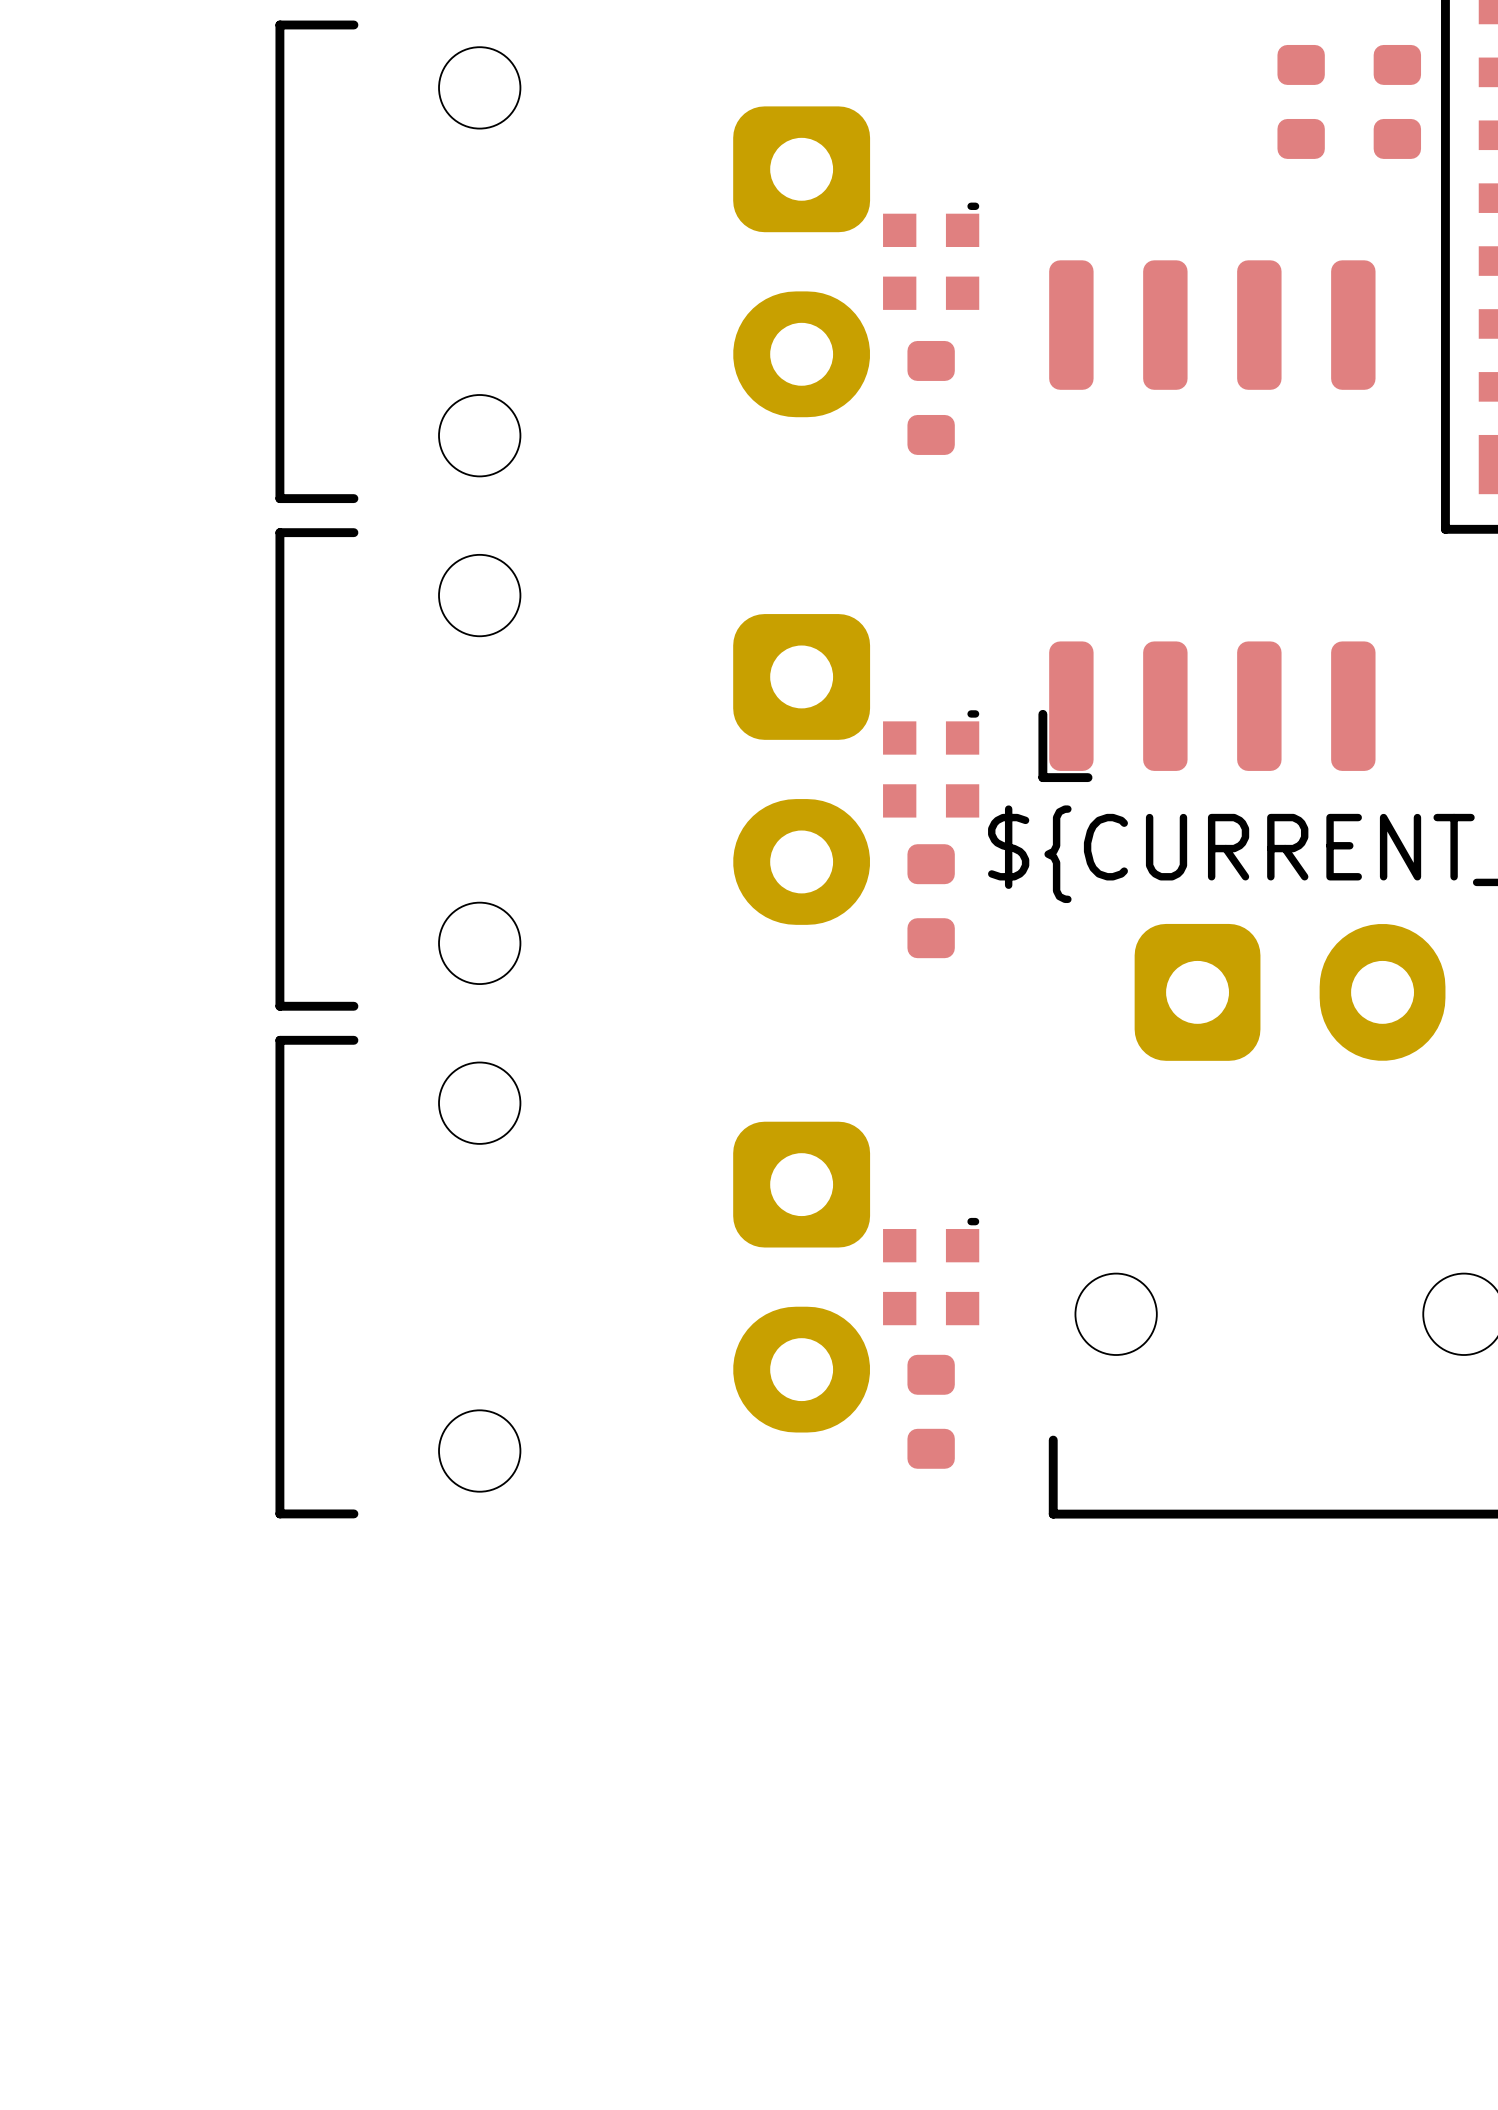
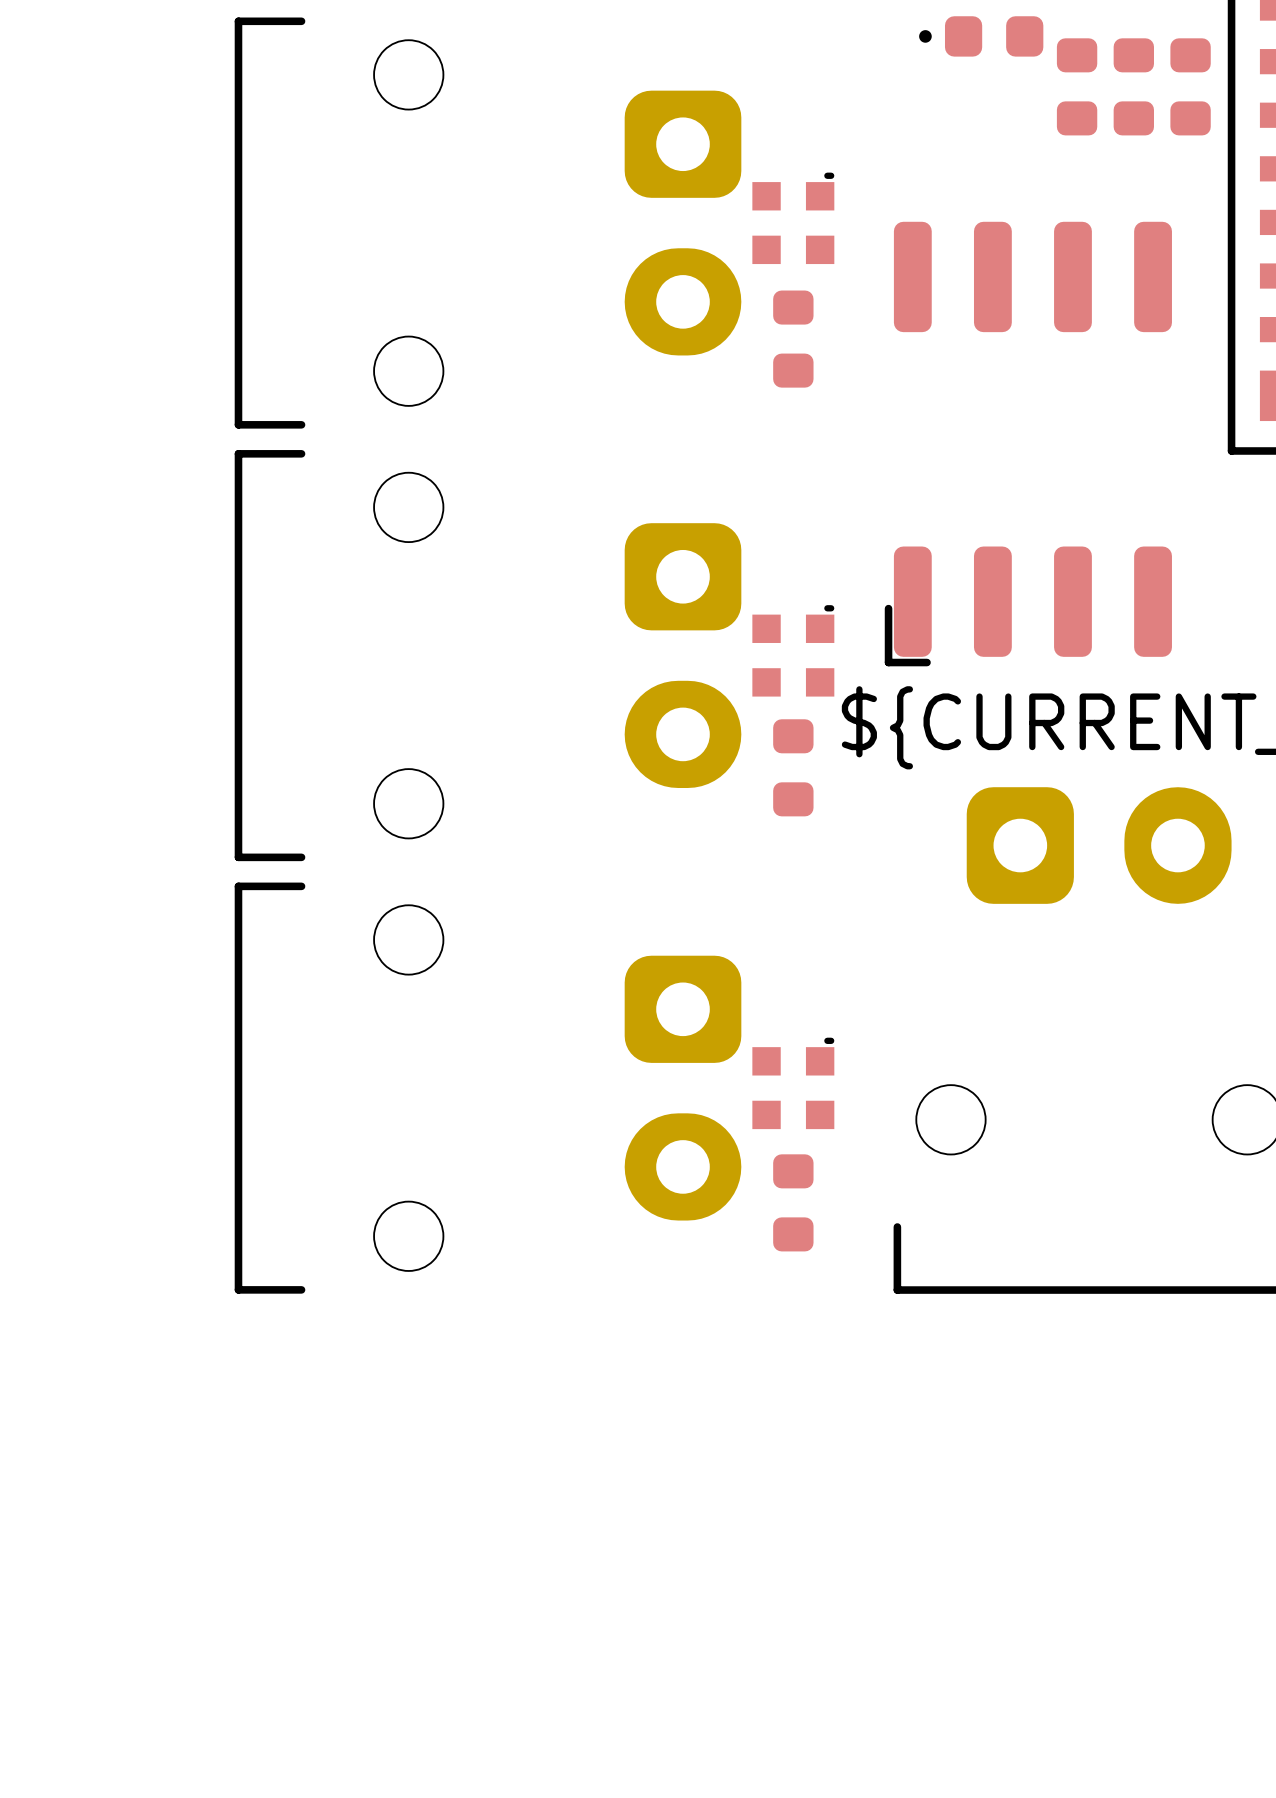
part: none -> (981, 36)
part: none -> (1077, 86)
part: (1301, 101) -> none
part: none -> (1133, 86)

